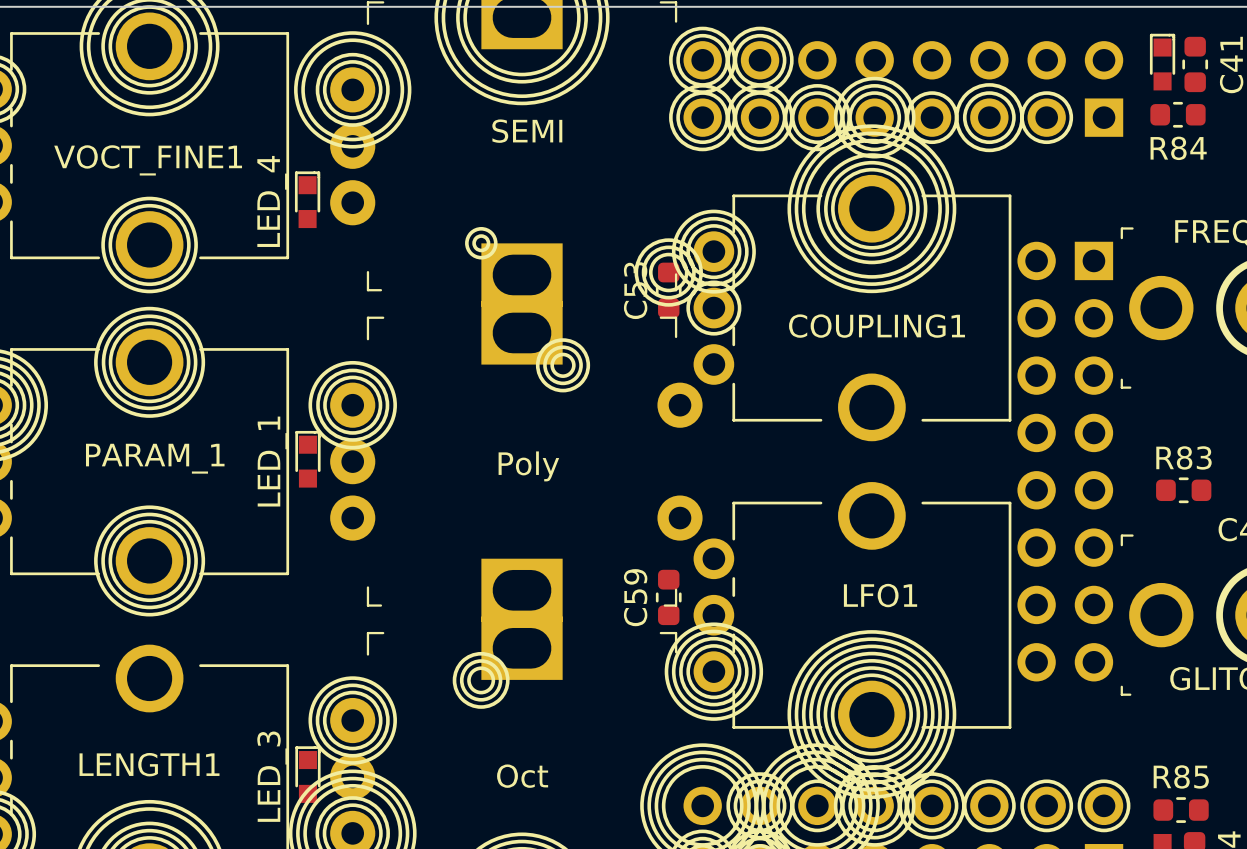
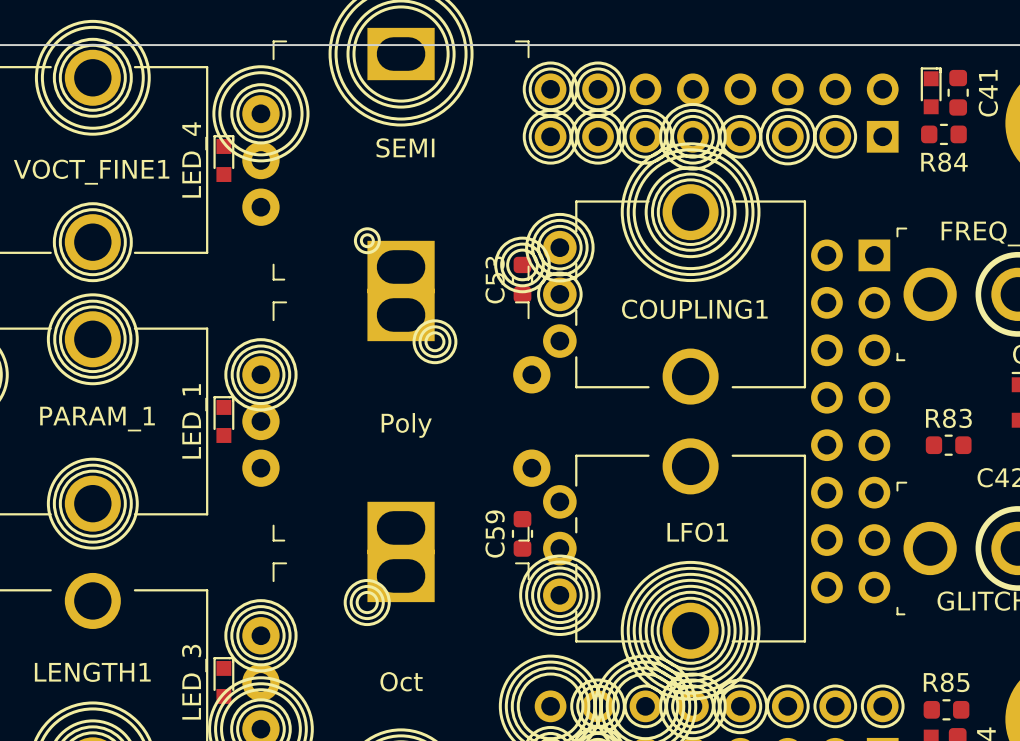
LED_4 position: (307, 199) -> (223, 158)

